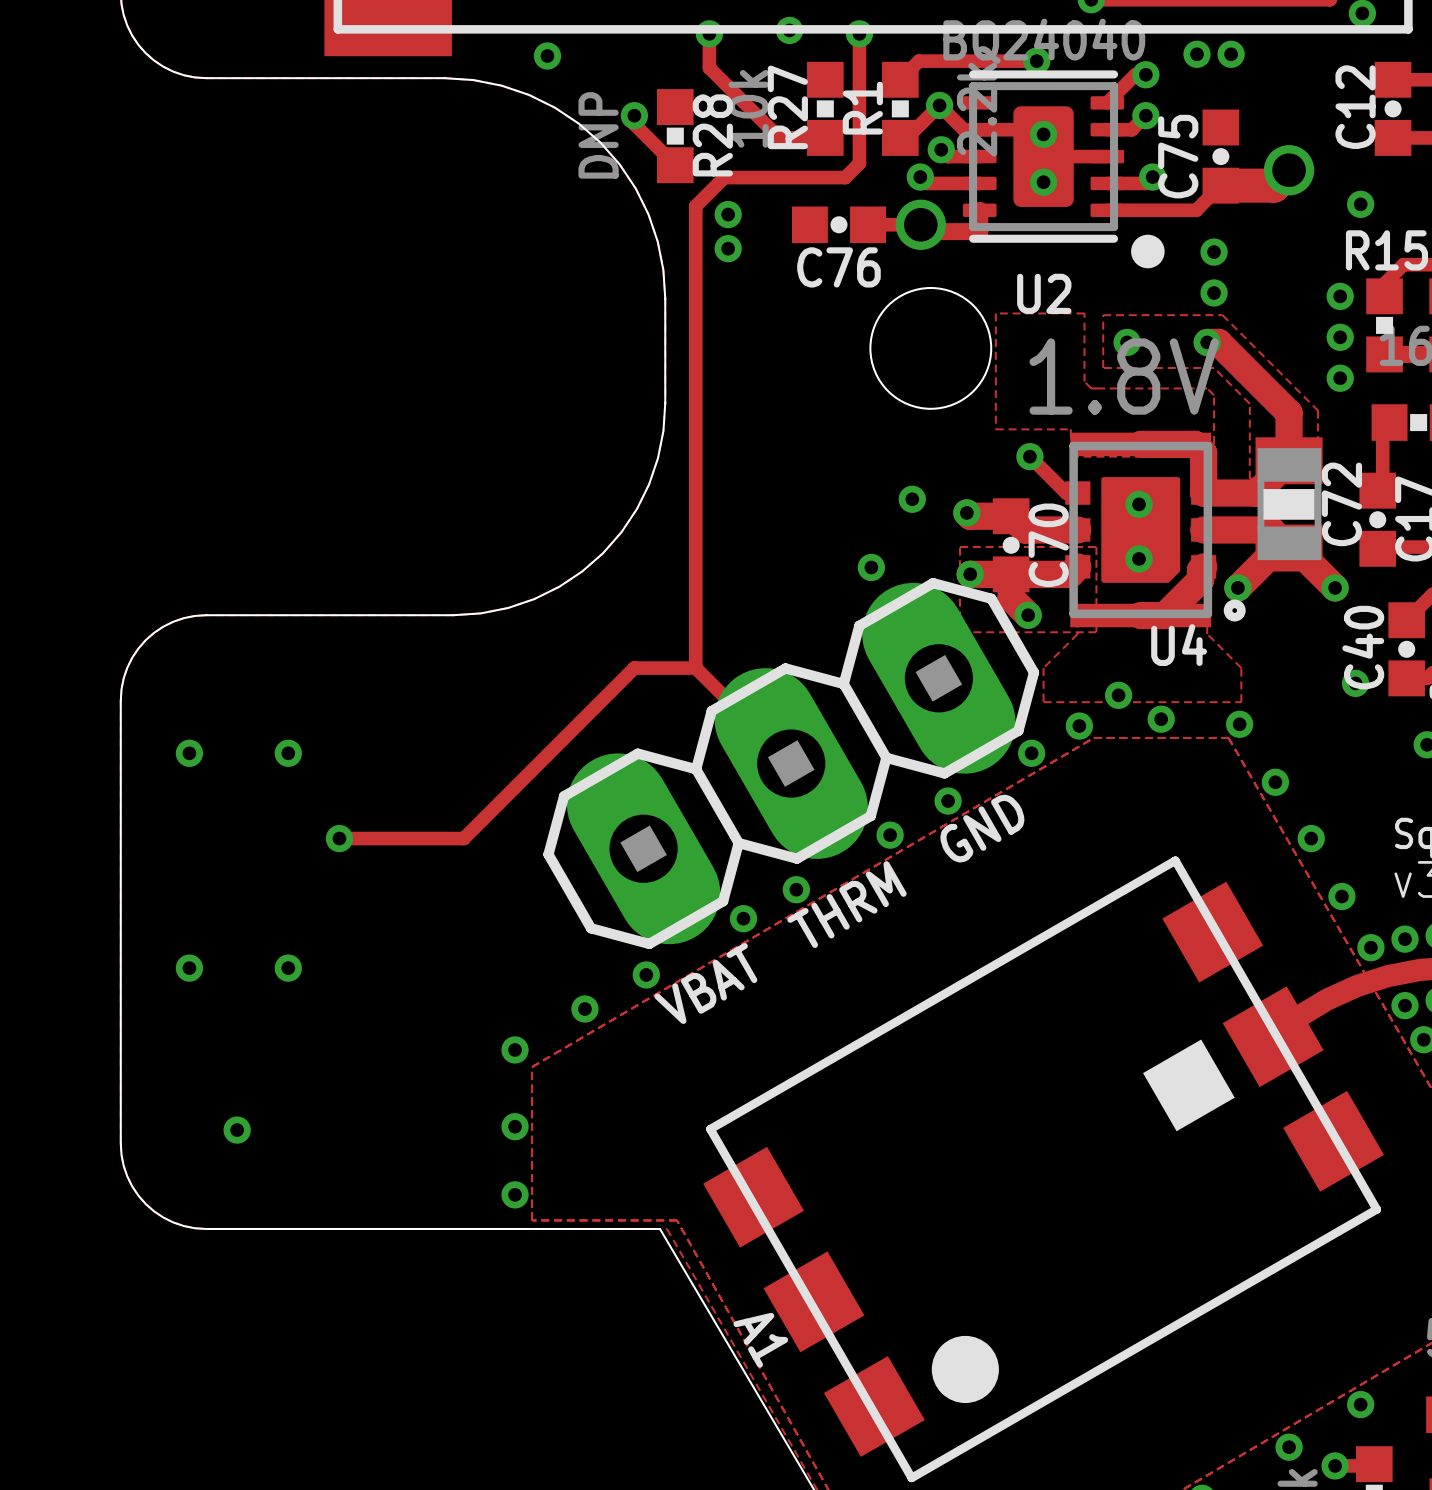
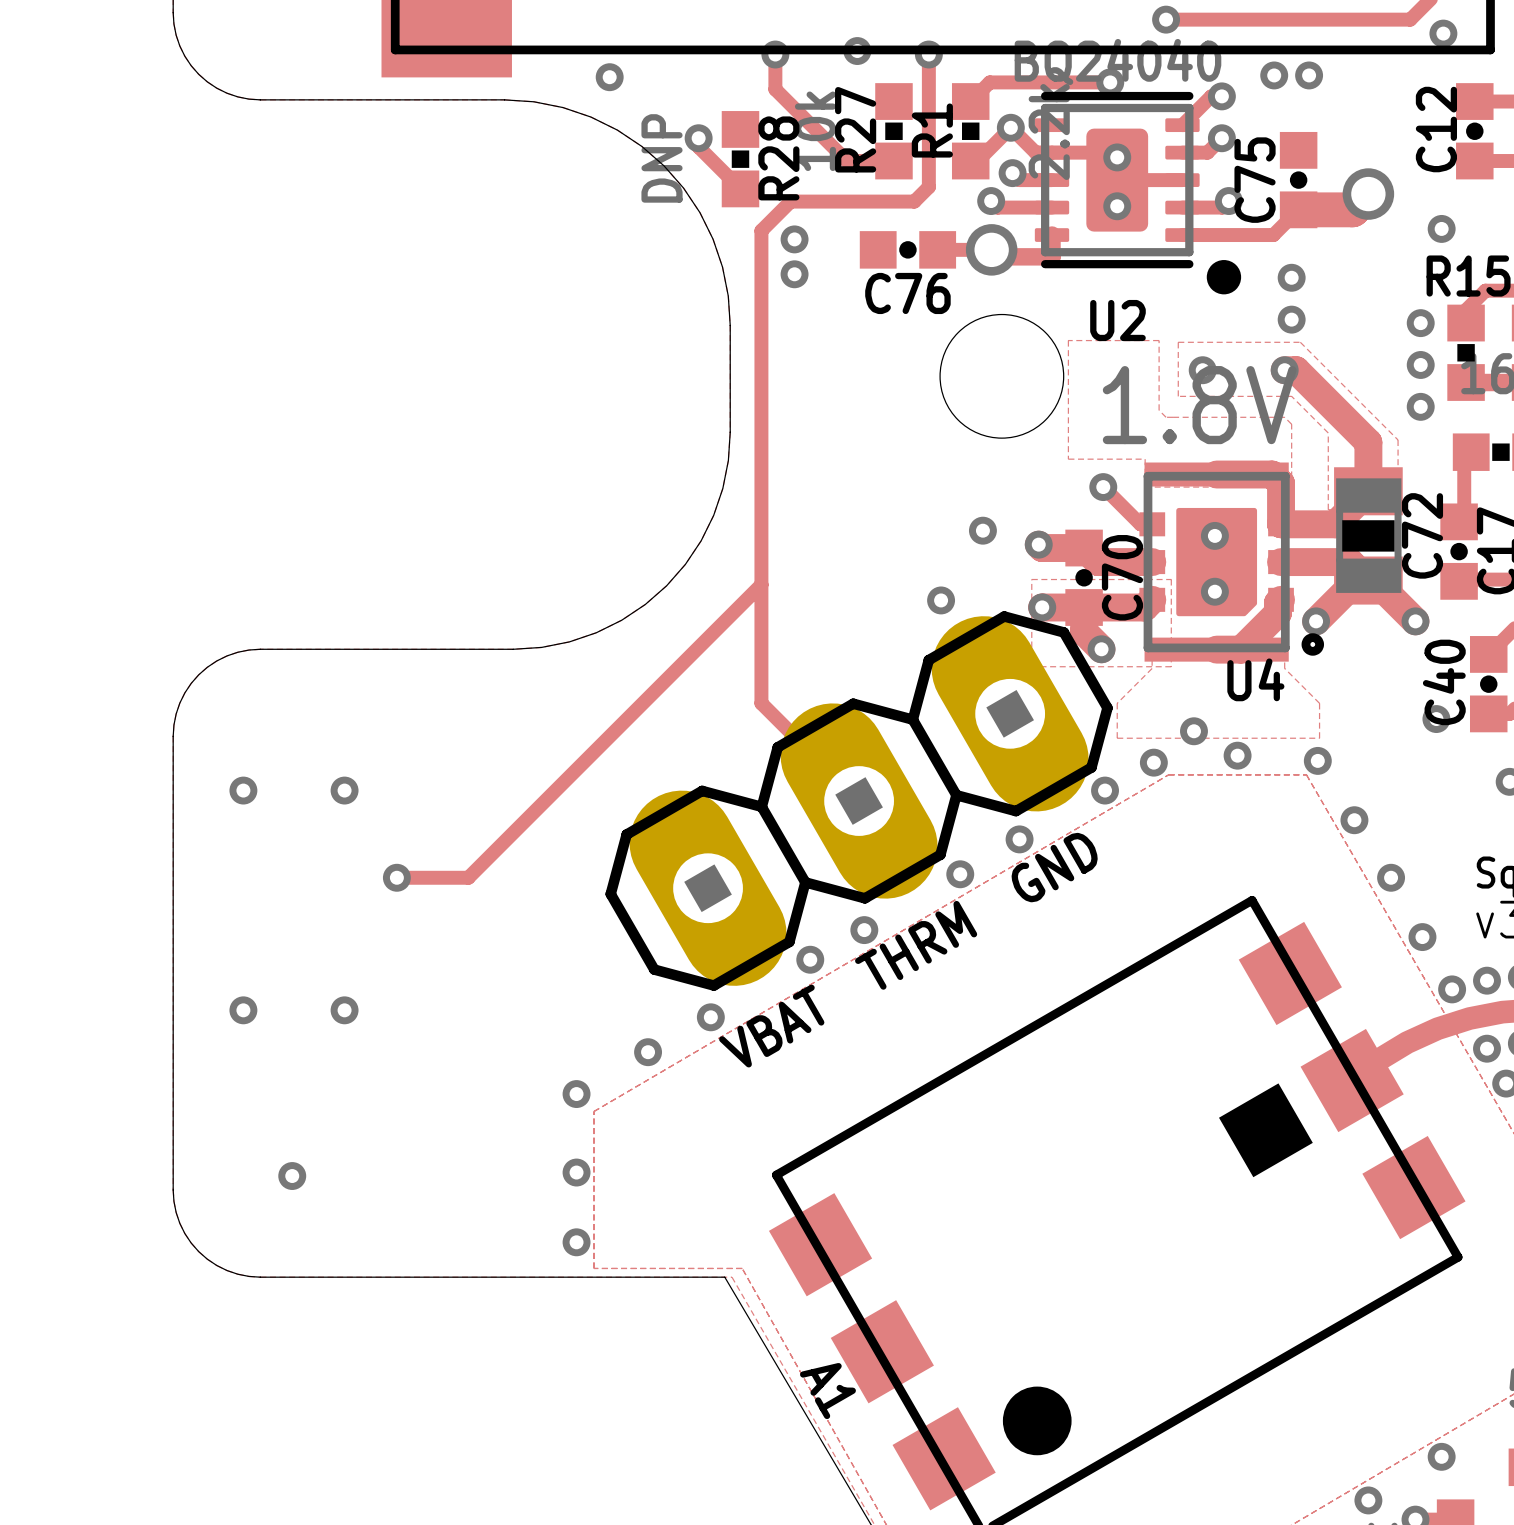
track: (695, 668) (634, 668) (463, 838) (409, 838) -> (761, 584) (468, 877)

